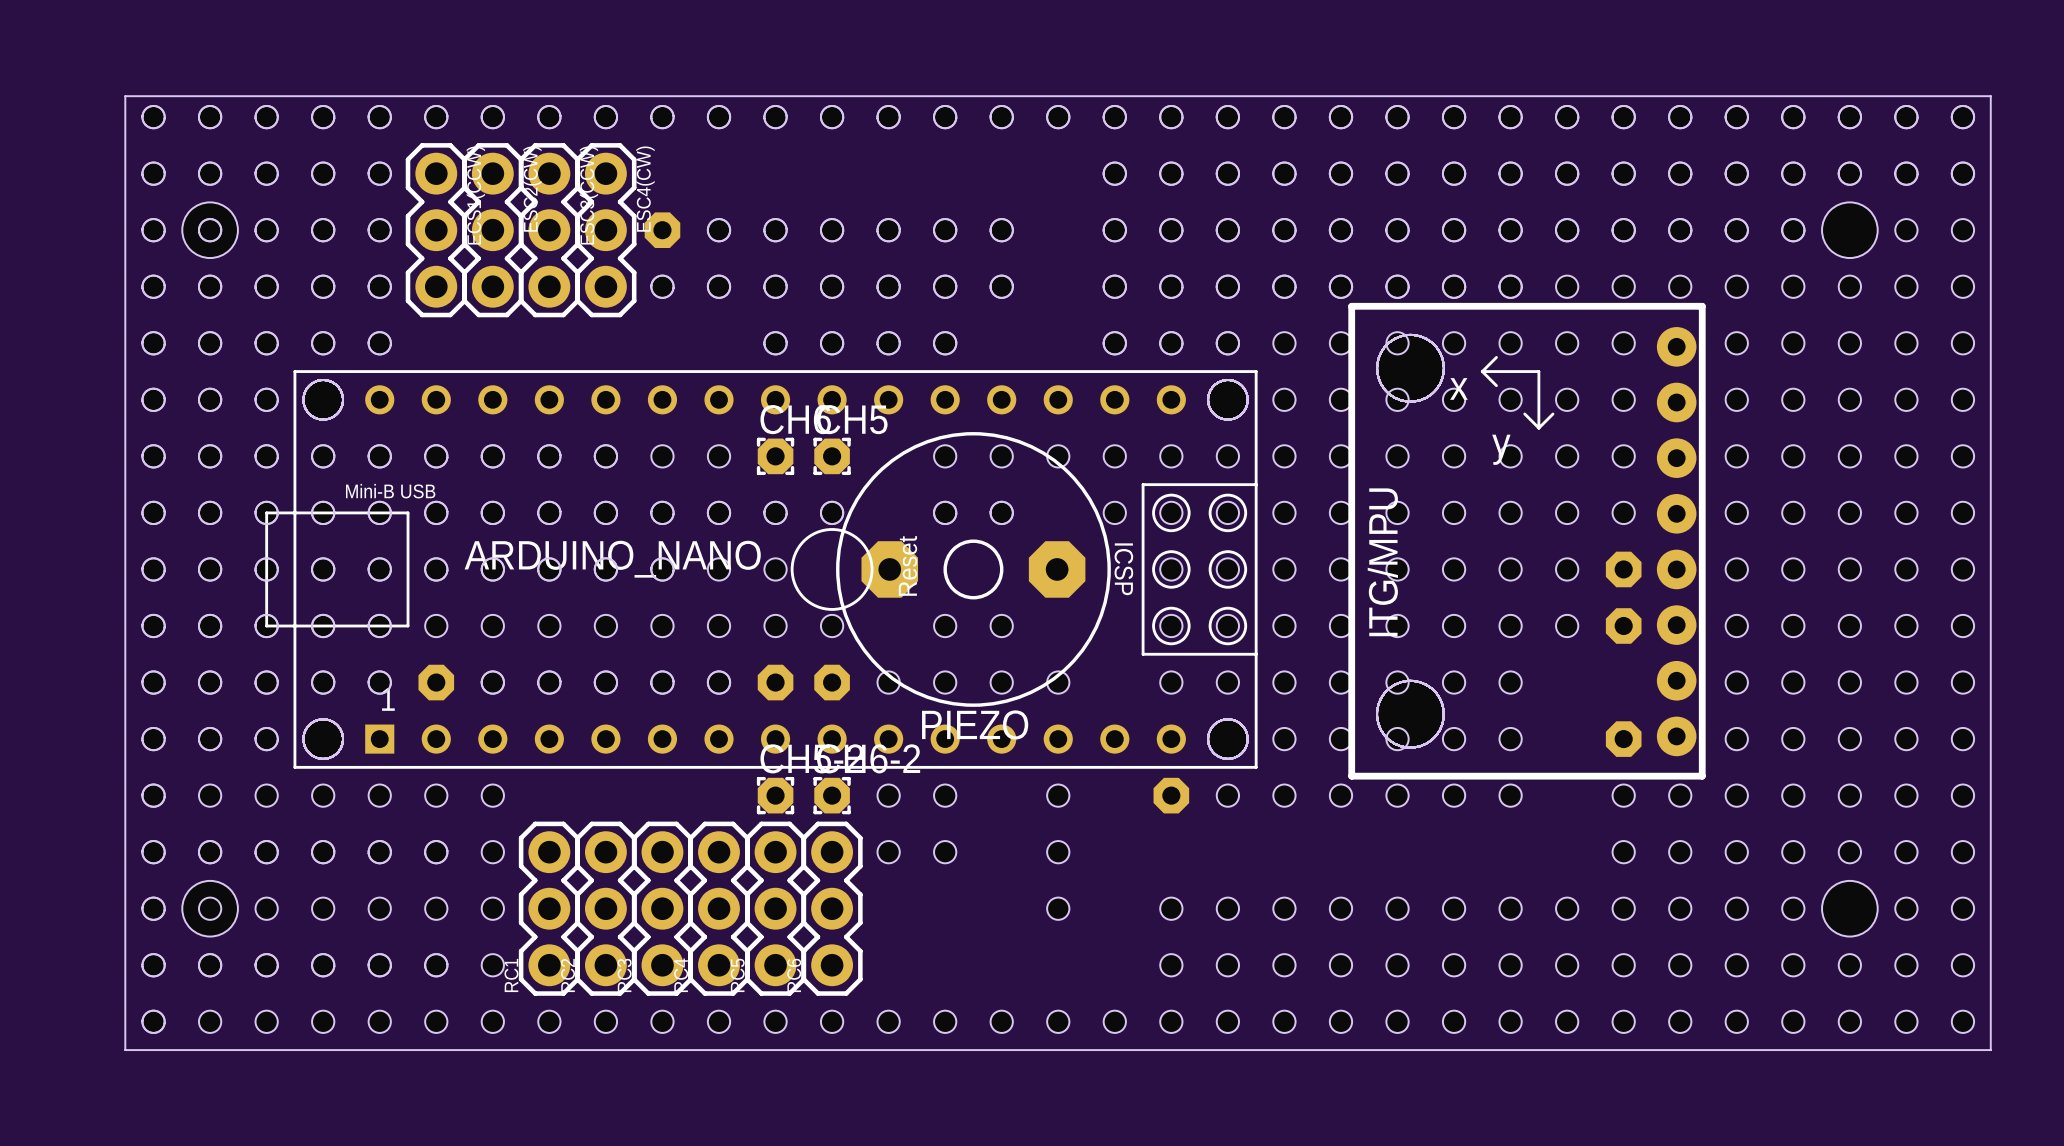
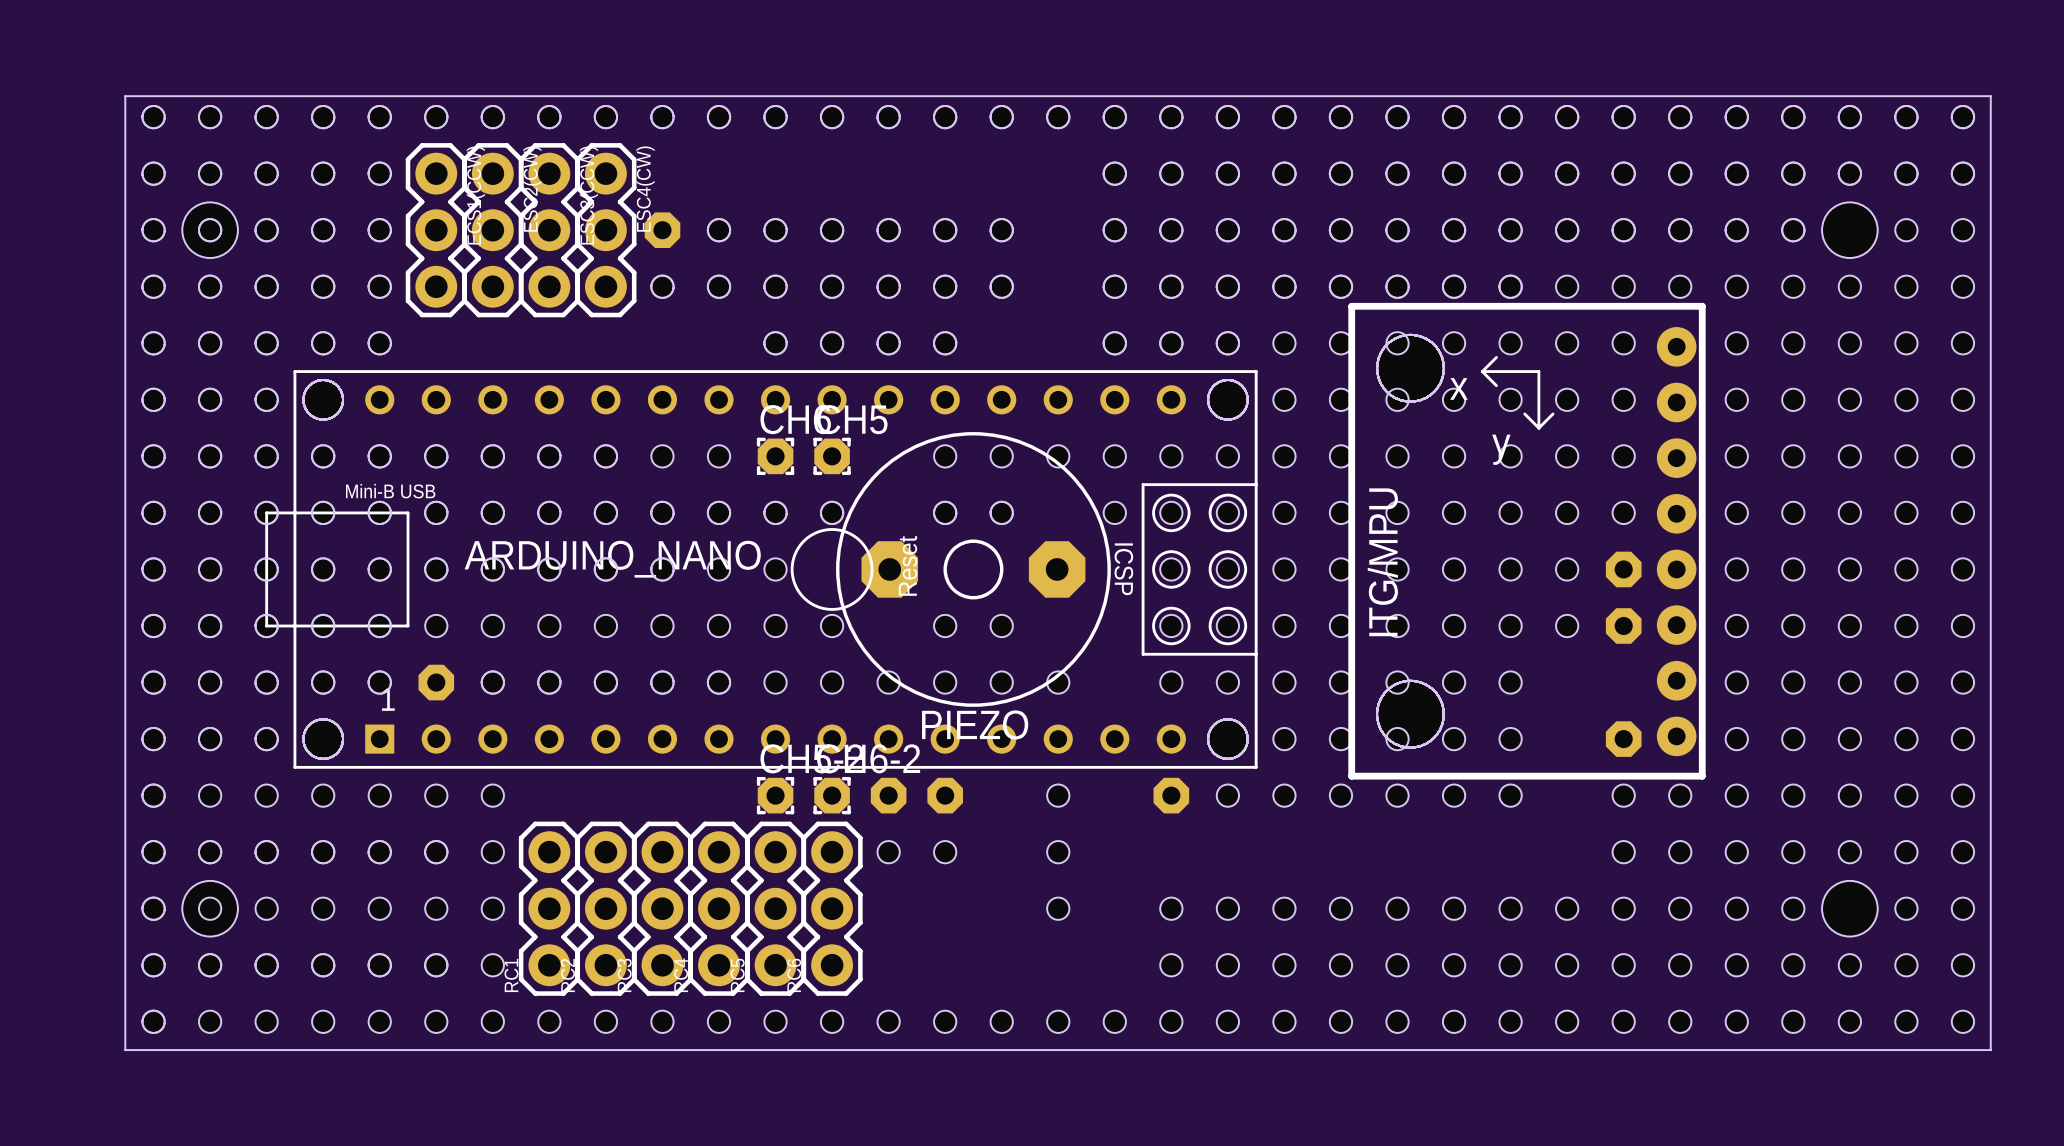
hole: none -> (775, 682)
part: (775, 682) -> none
hole: none -> (832, 682)
part: (832, 682) -> none
hole: (888, 795) -> none
part: none -> (888, 795)
hole: (945, 795) -> none
part: none -> (945, 795)

